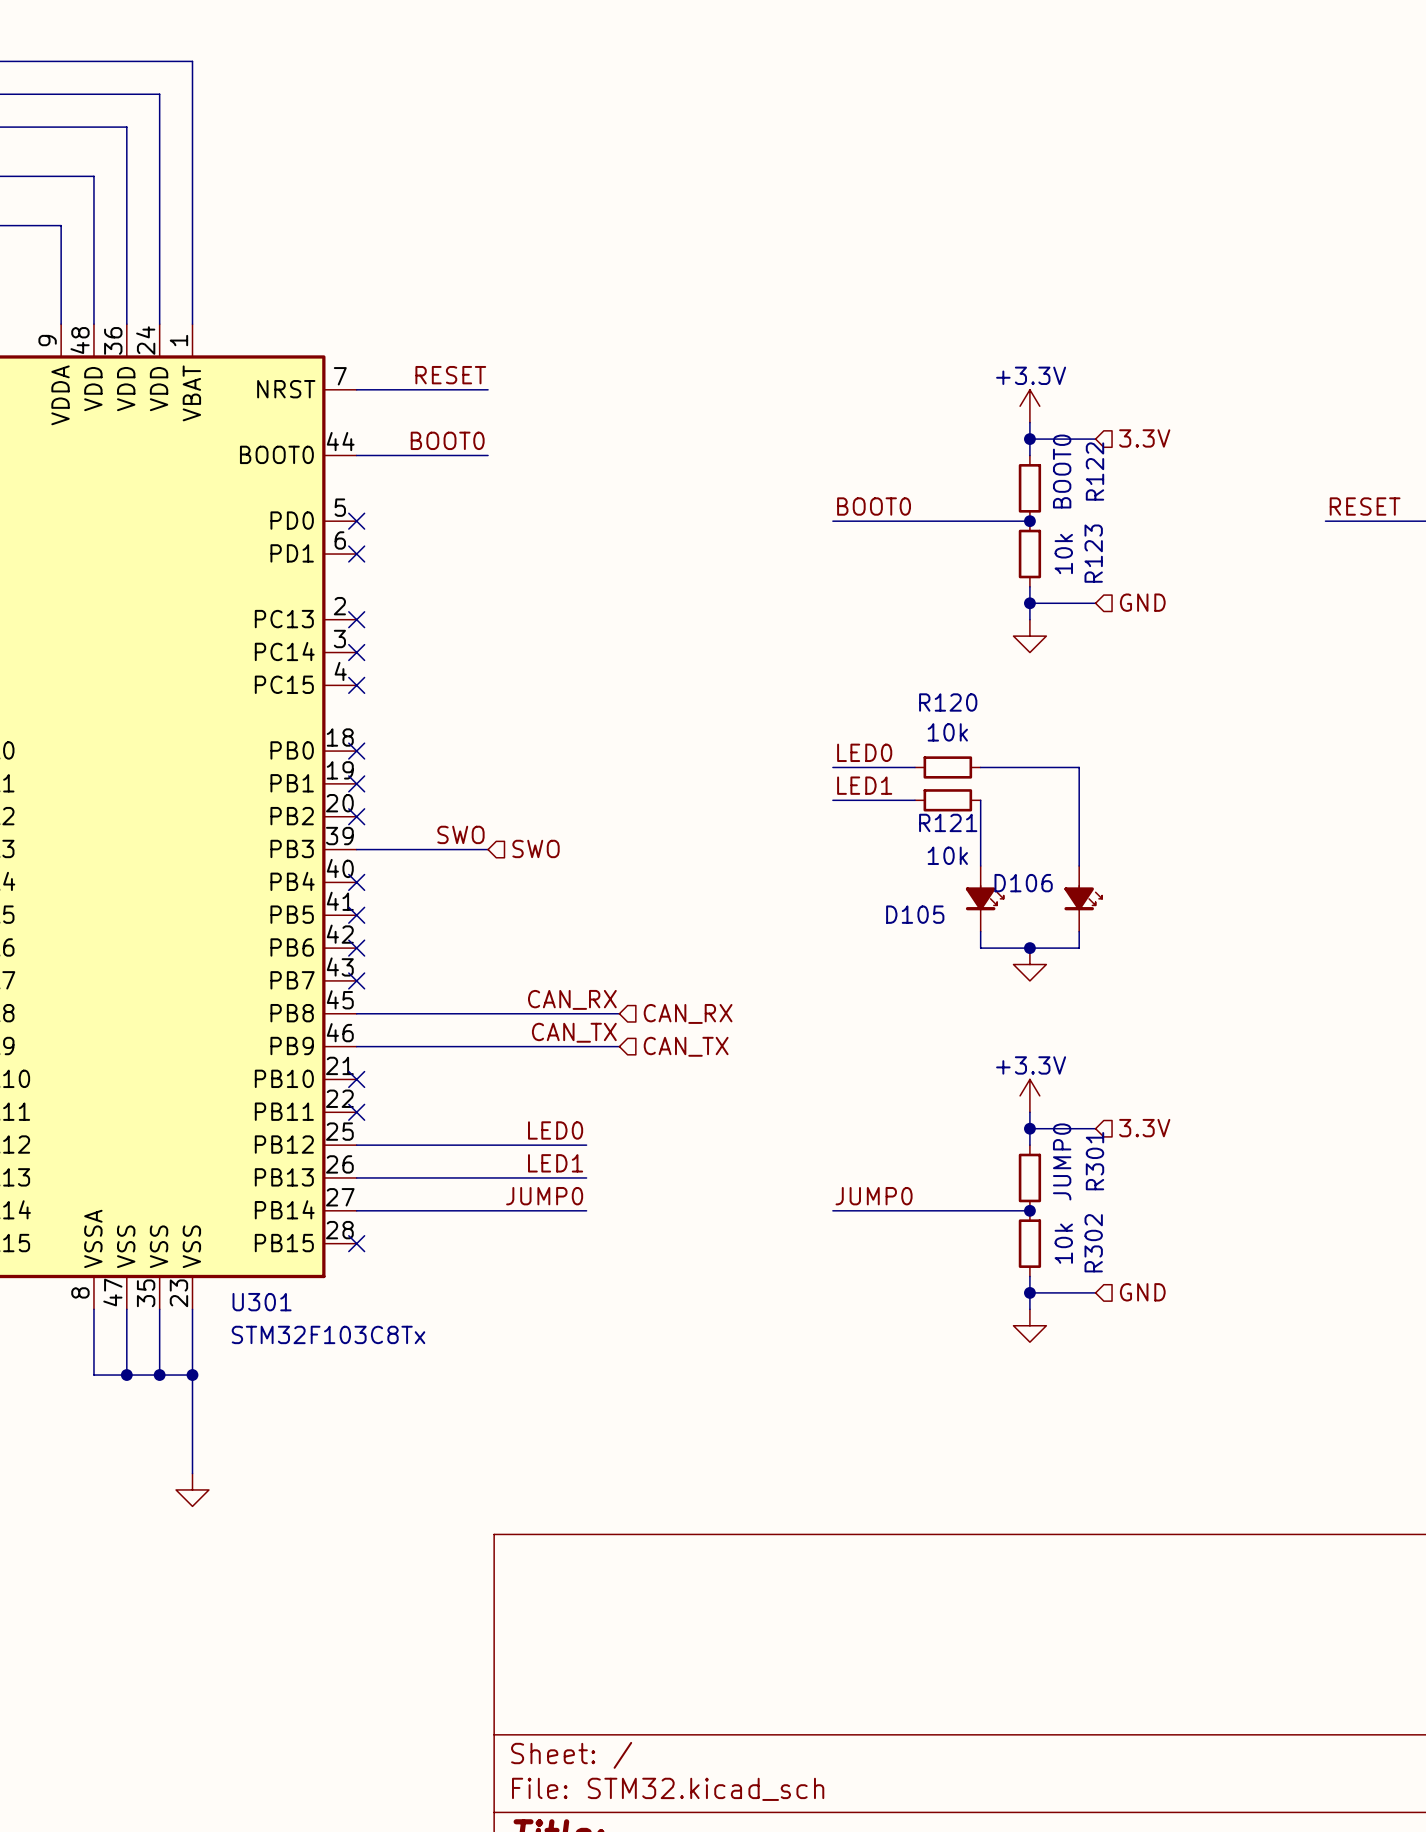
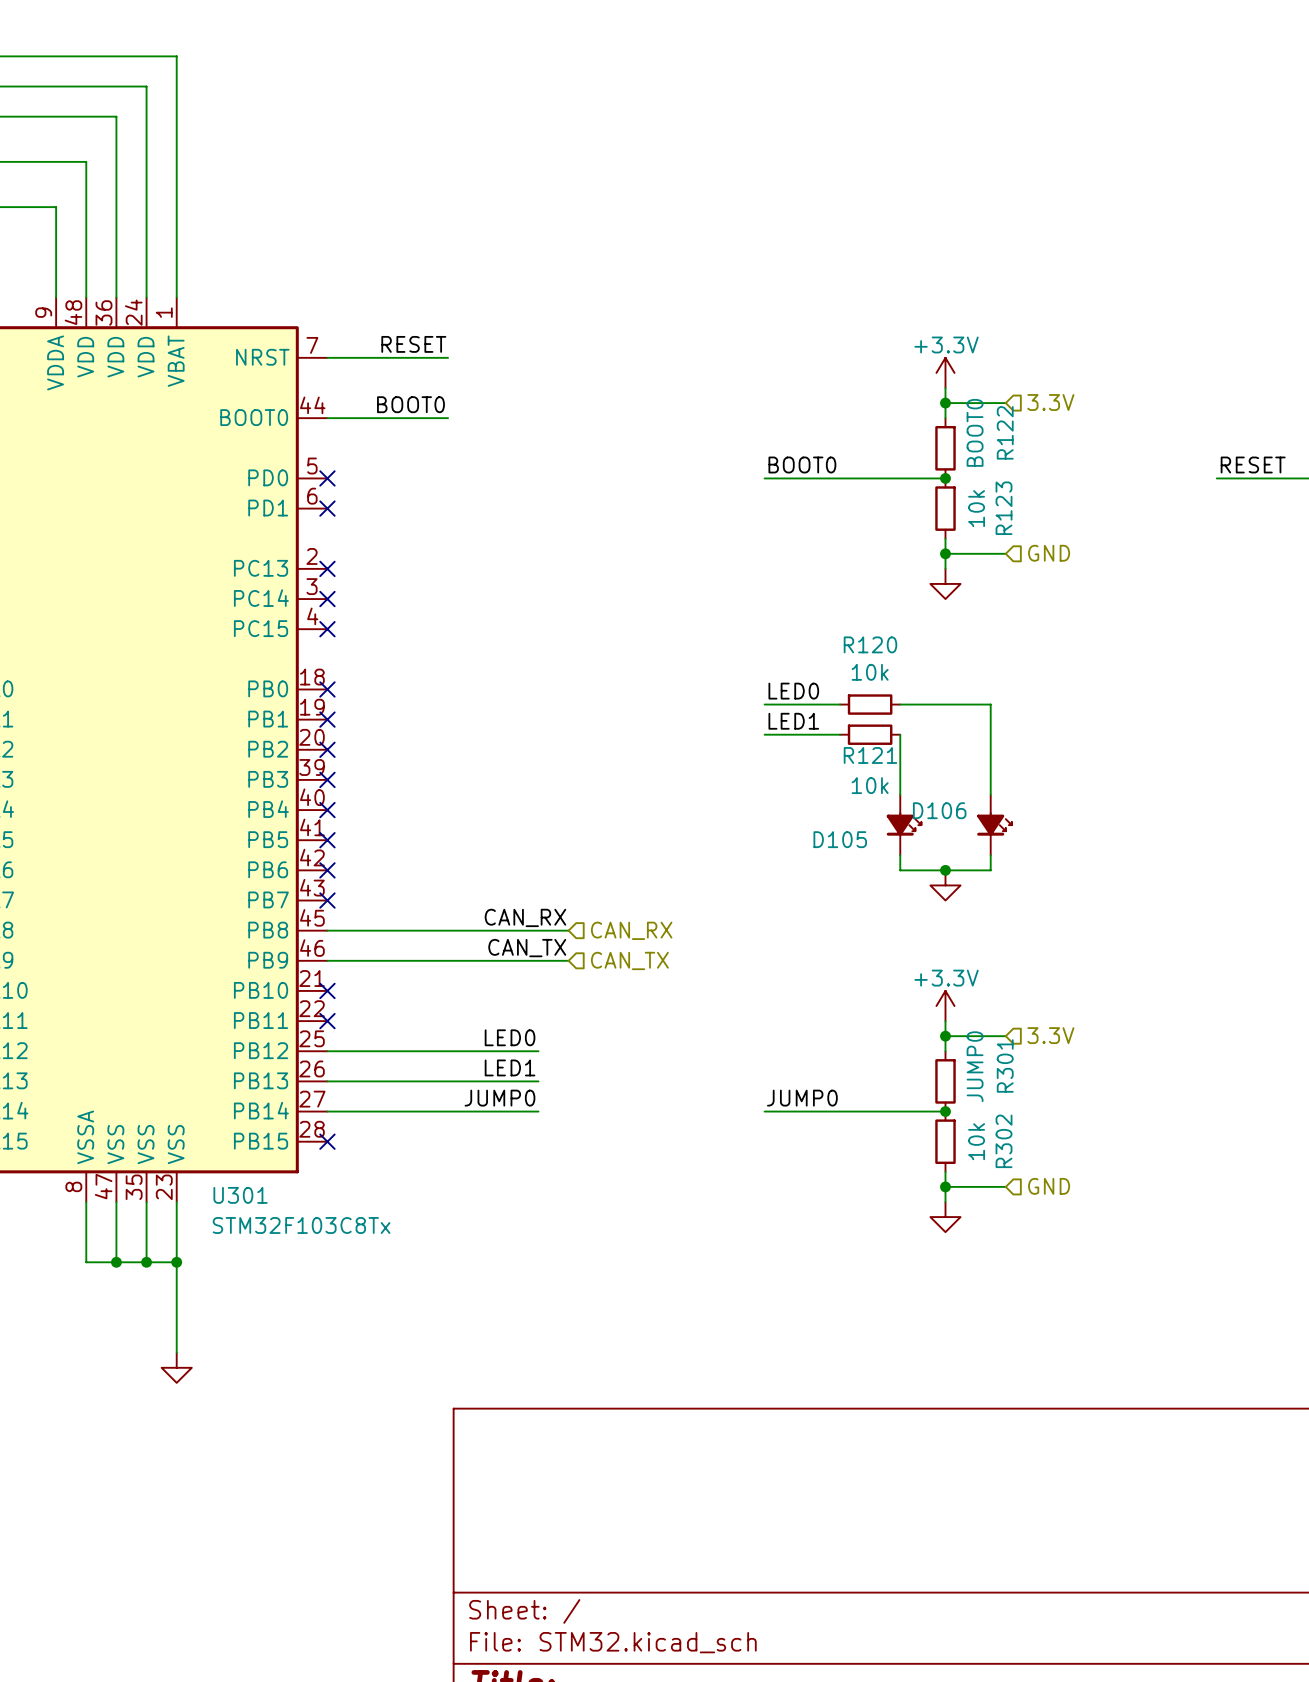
label: SWO (460, 834) -> none
hierarchical label: SWO (536, 848) -> none
wire: (356, 849) (488, 849) -> none
no-connect mark: none -> (327, 779)

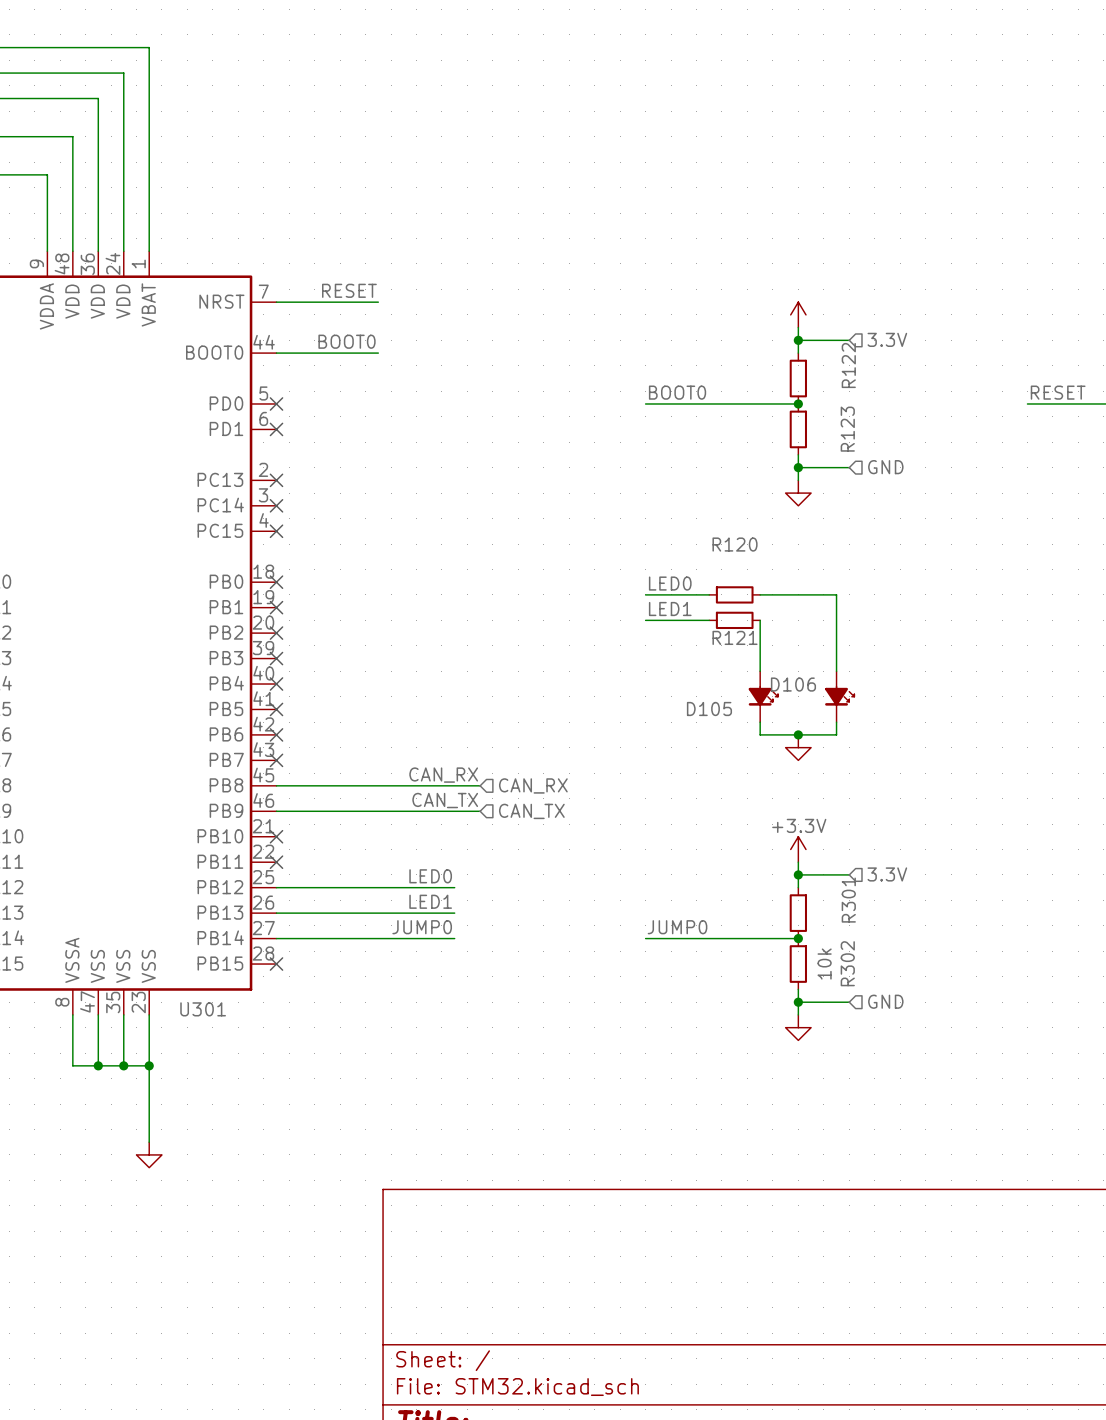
power symbol text: +3.3V (946, 344) -> none
R122 value: BOOT0 (975, 432) -> none
R123 value: 10k (976, 508) -> none
R120 value: 10k (870, 672) -> none
R121 value: 10k (870, 785) -> none
R301 value: JUMP0 (975, 1066) -> none
U301 value: STM32F103C8Tx (301, 1225) -> none

